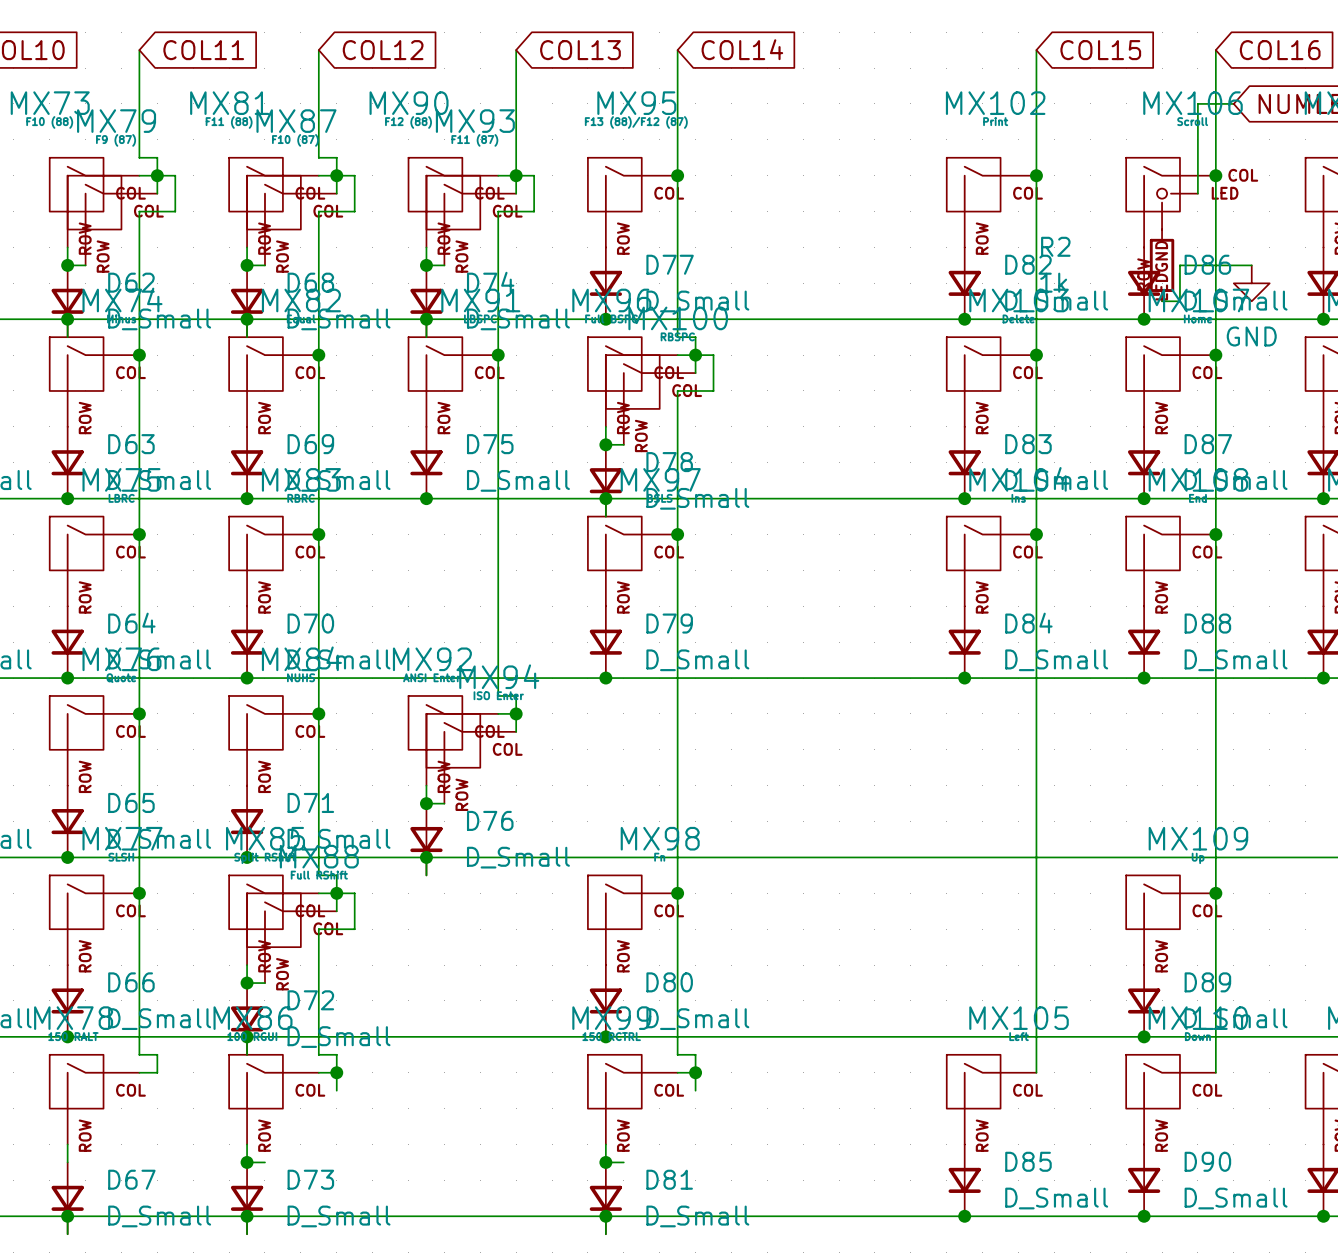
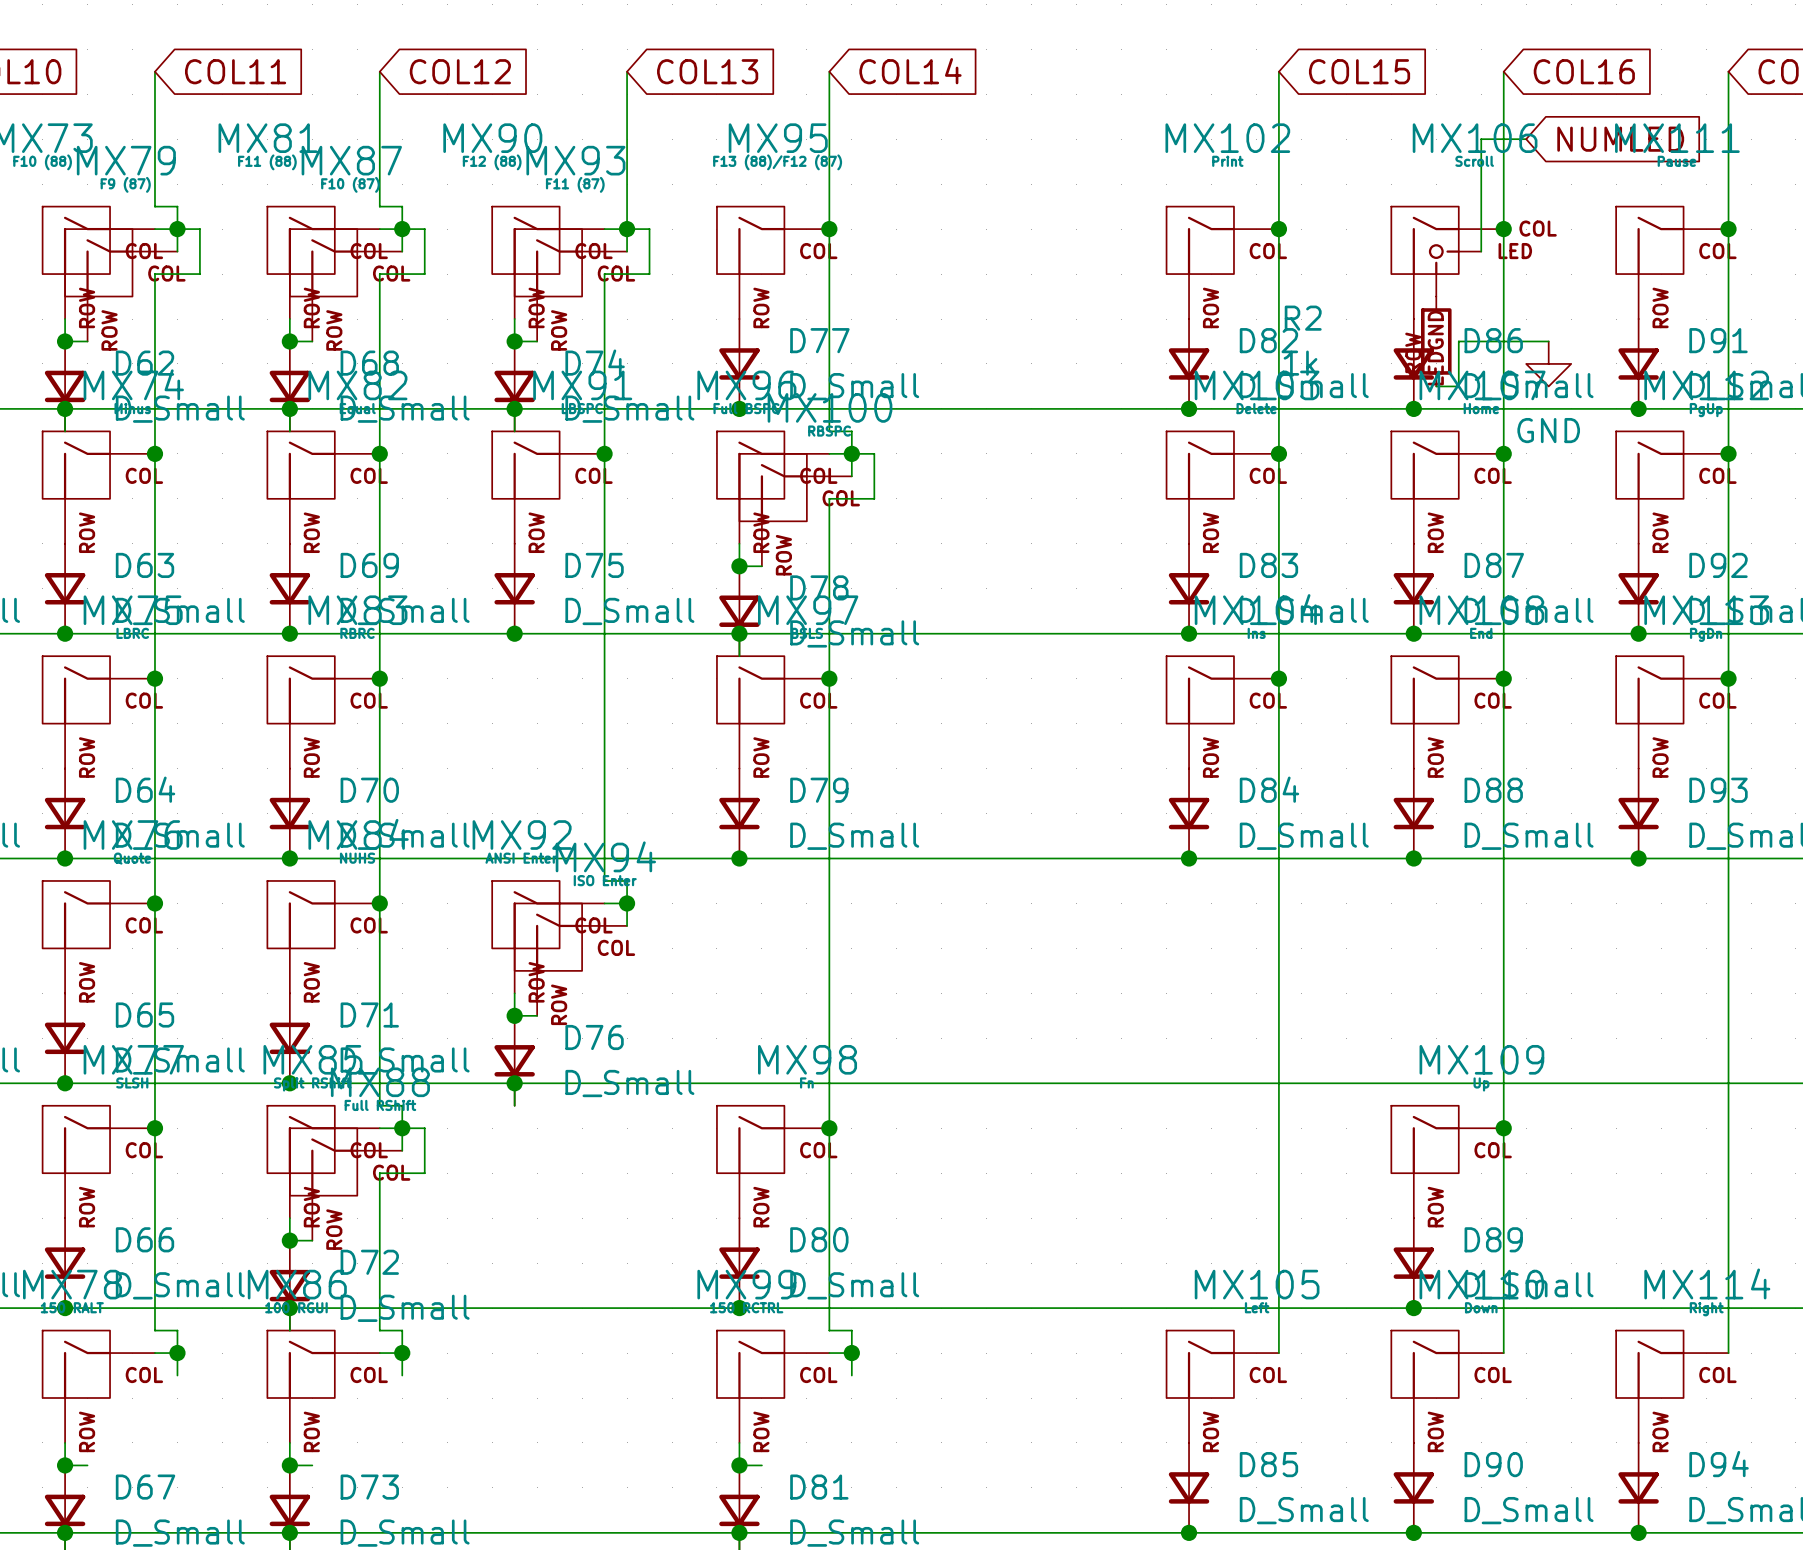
wire: none -> (177, 1353) (177, 1375)
junction: none -> (177, 1353)
wire: none -> (65, 1465) (87, 1465)
junction: none -> (65, 1465)

